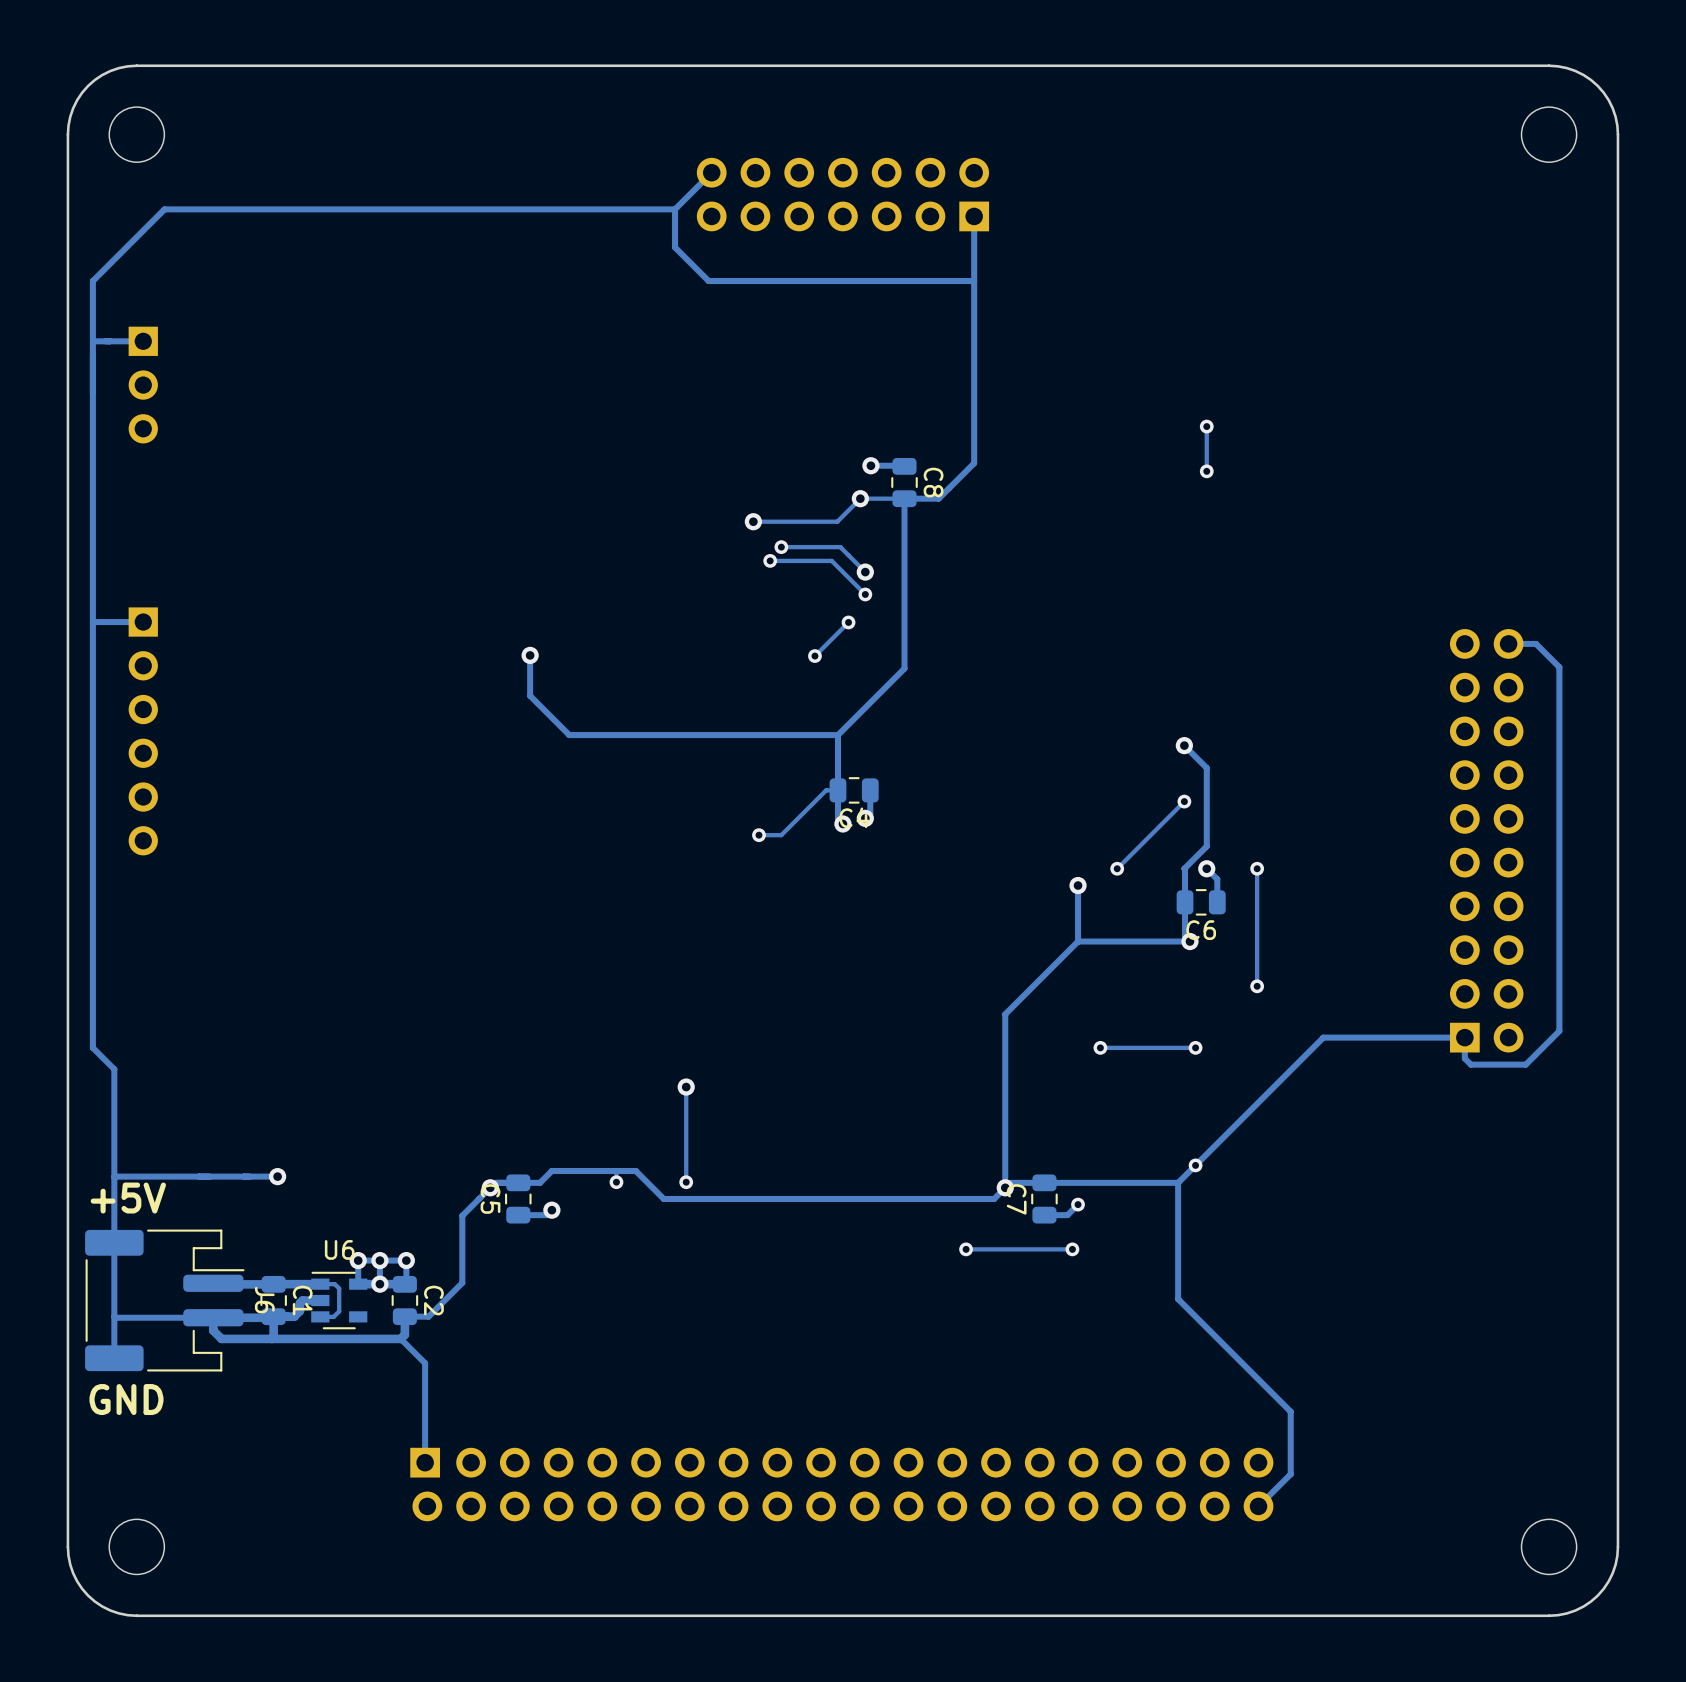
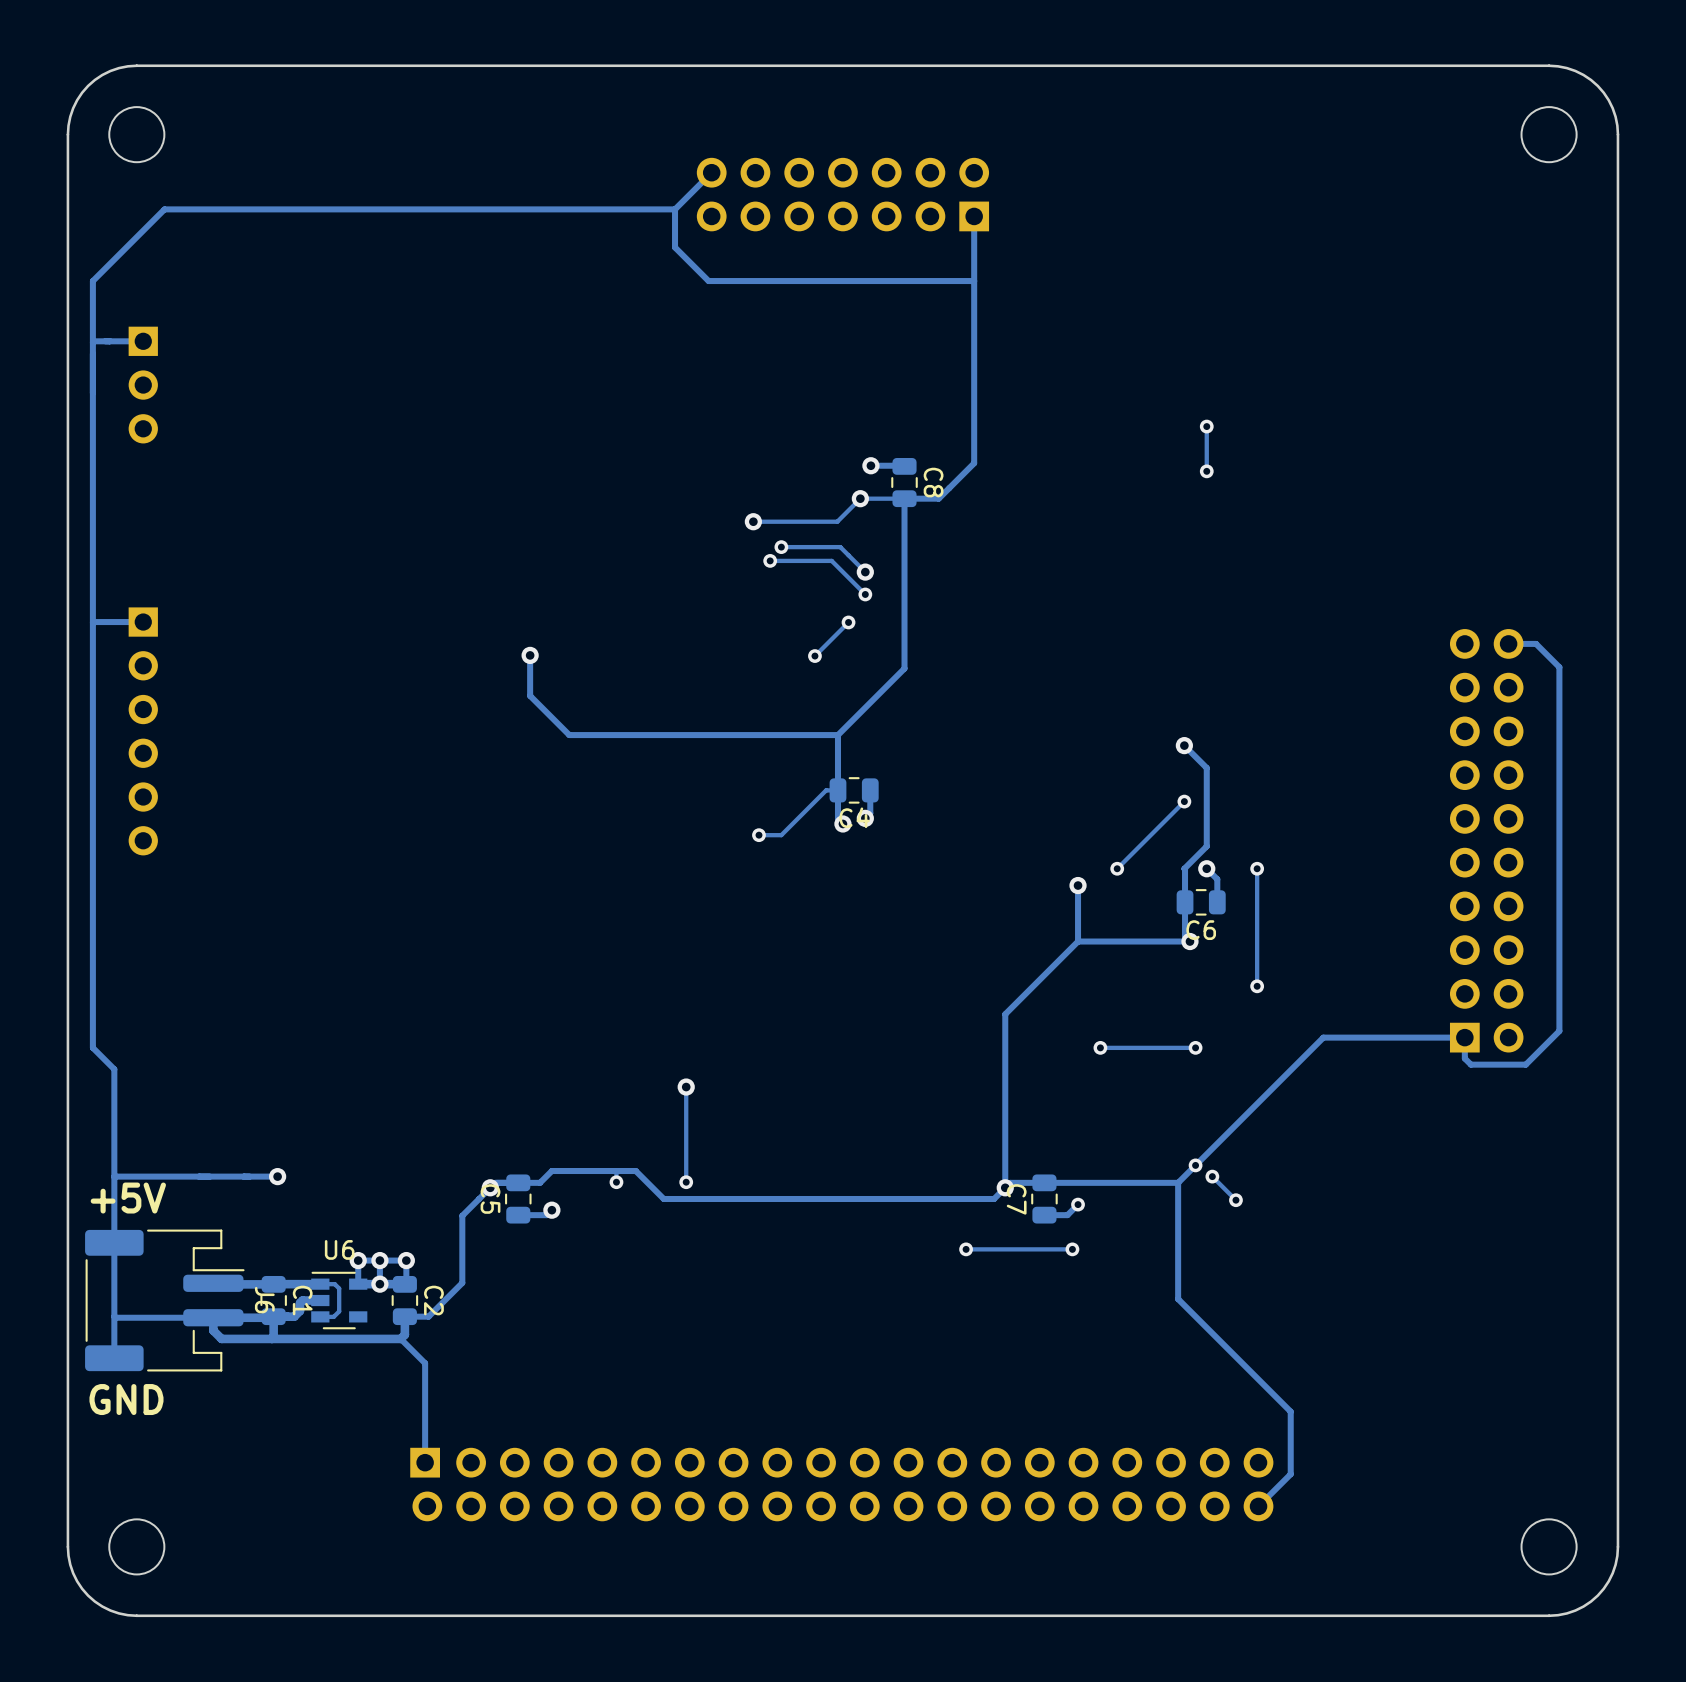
track: none -> (1212, 1176) (1235, 1200)
via: none -> (1212, 1176)
via: none -> (1235, 1200)

